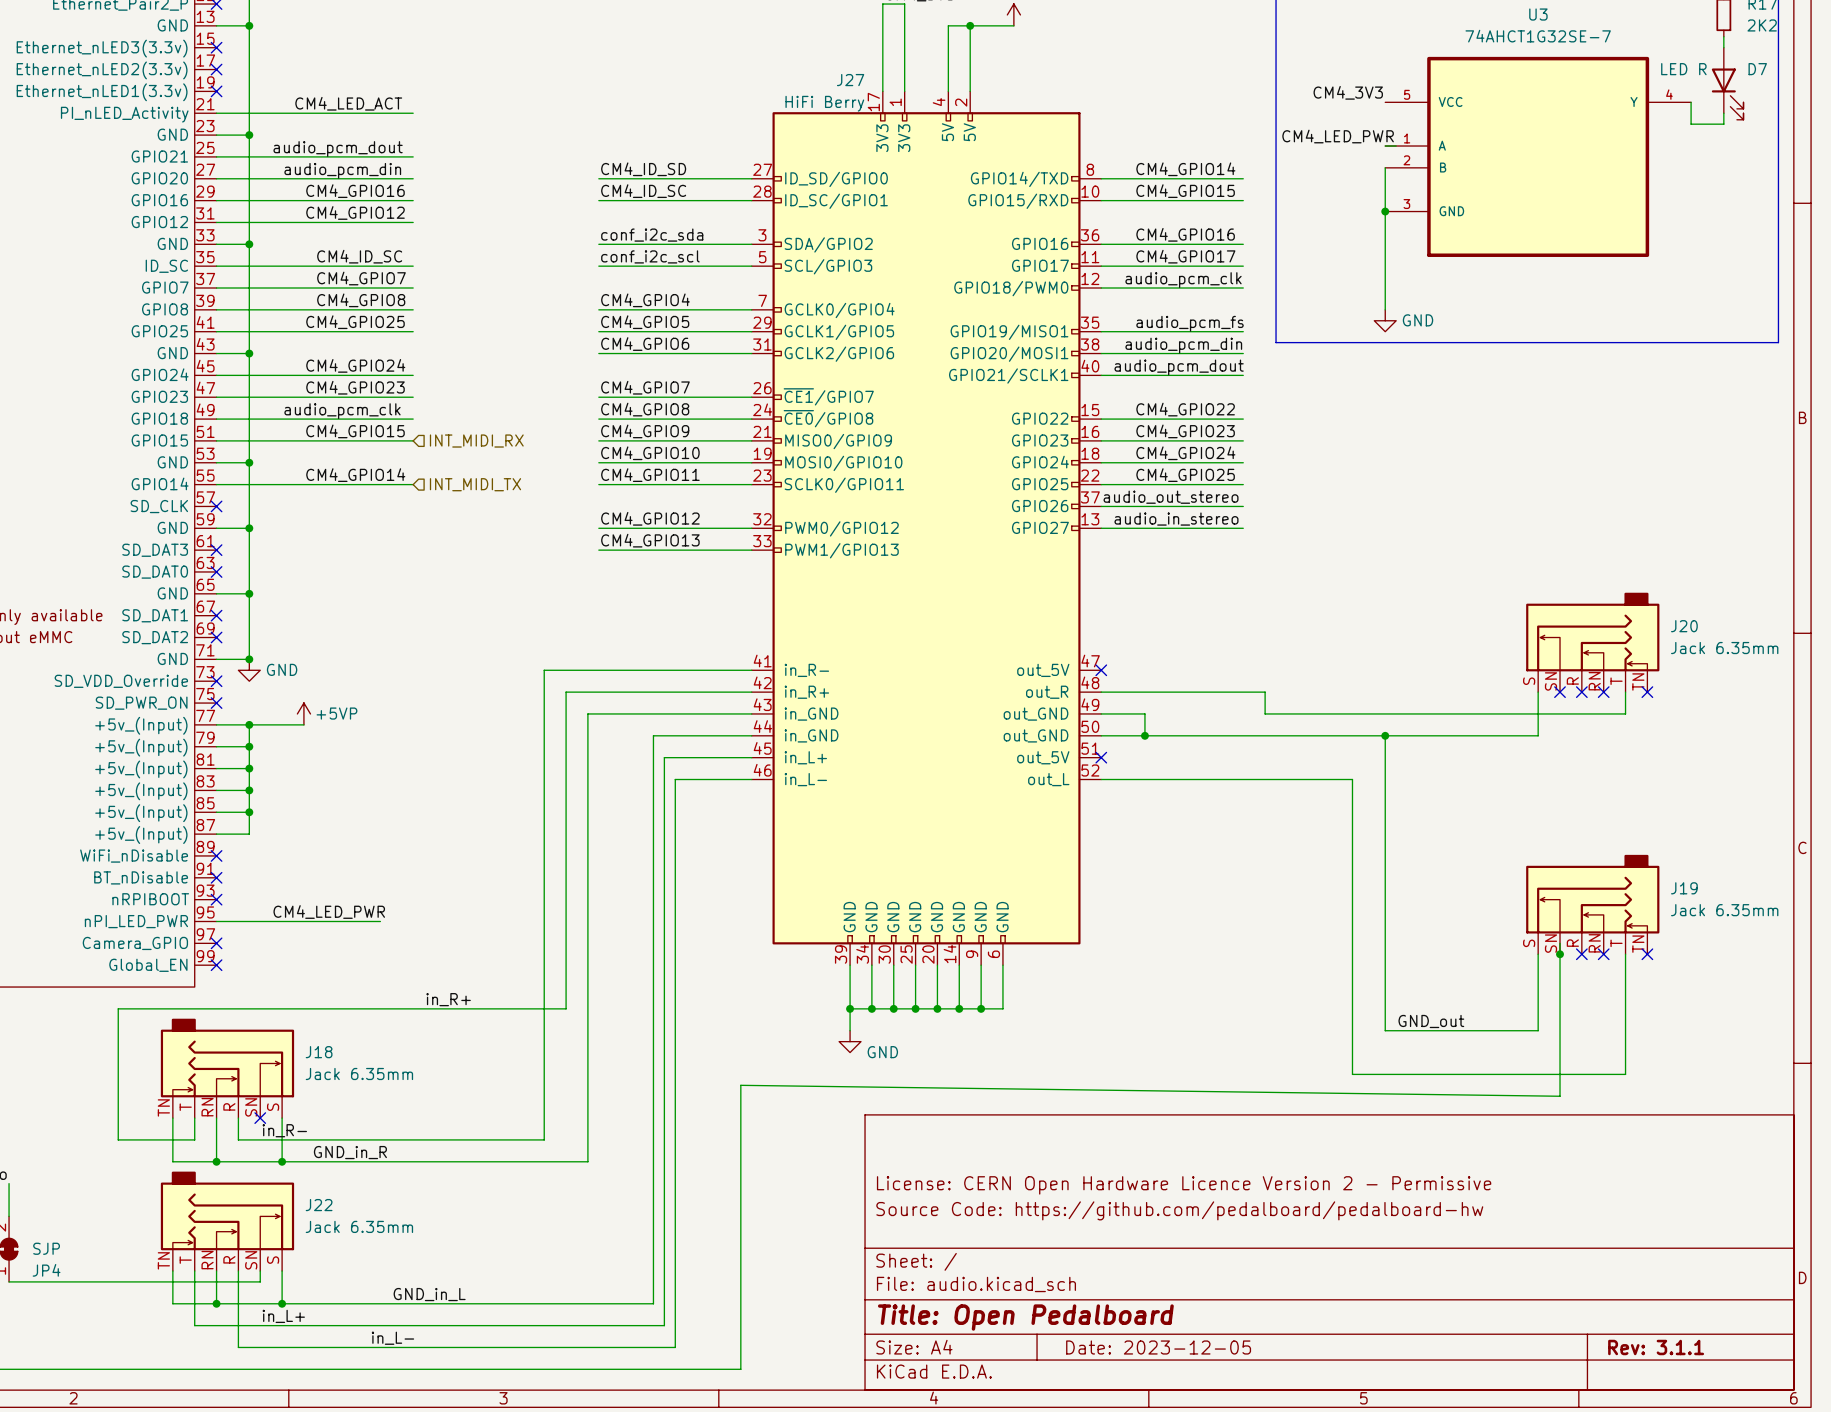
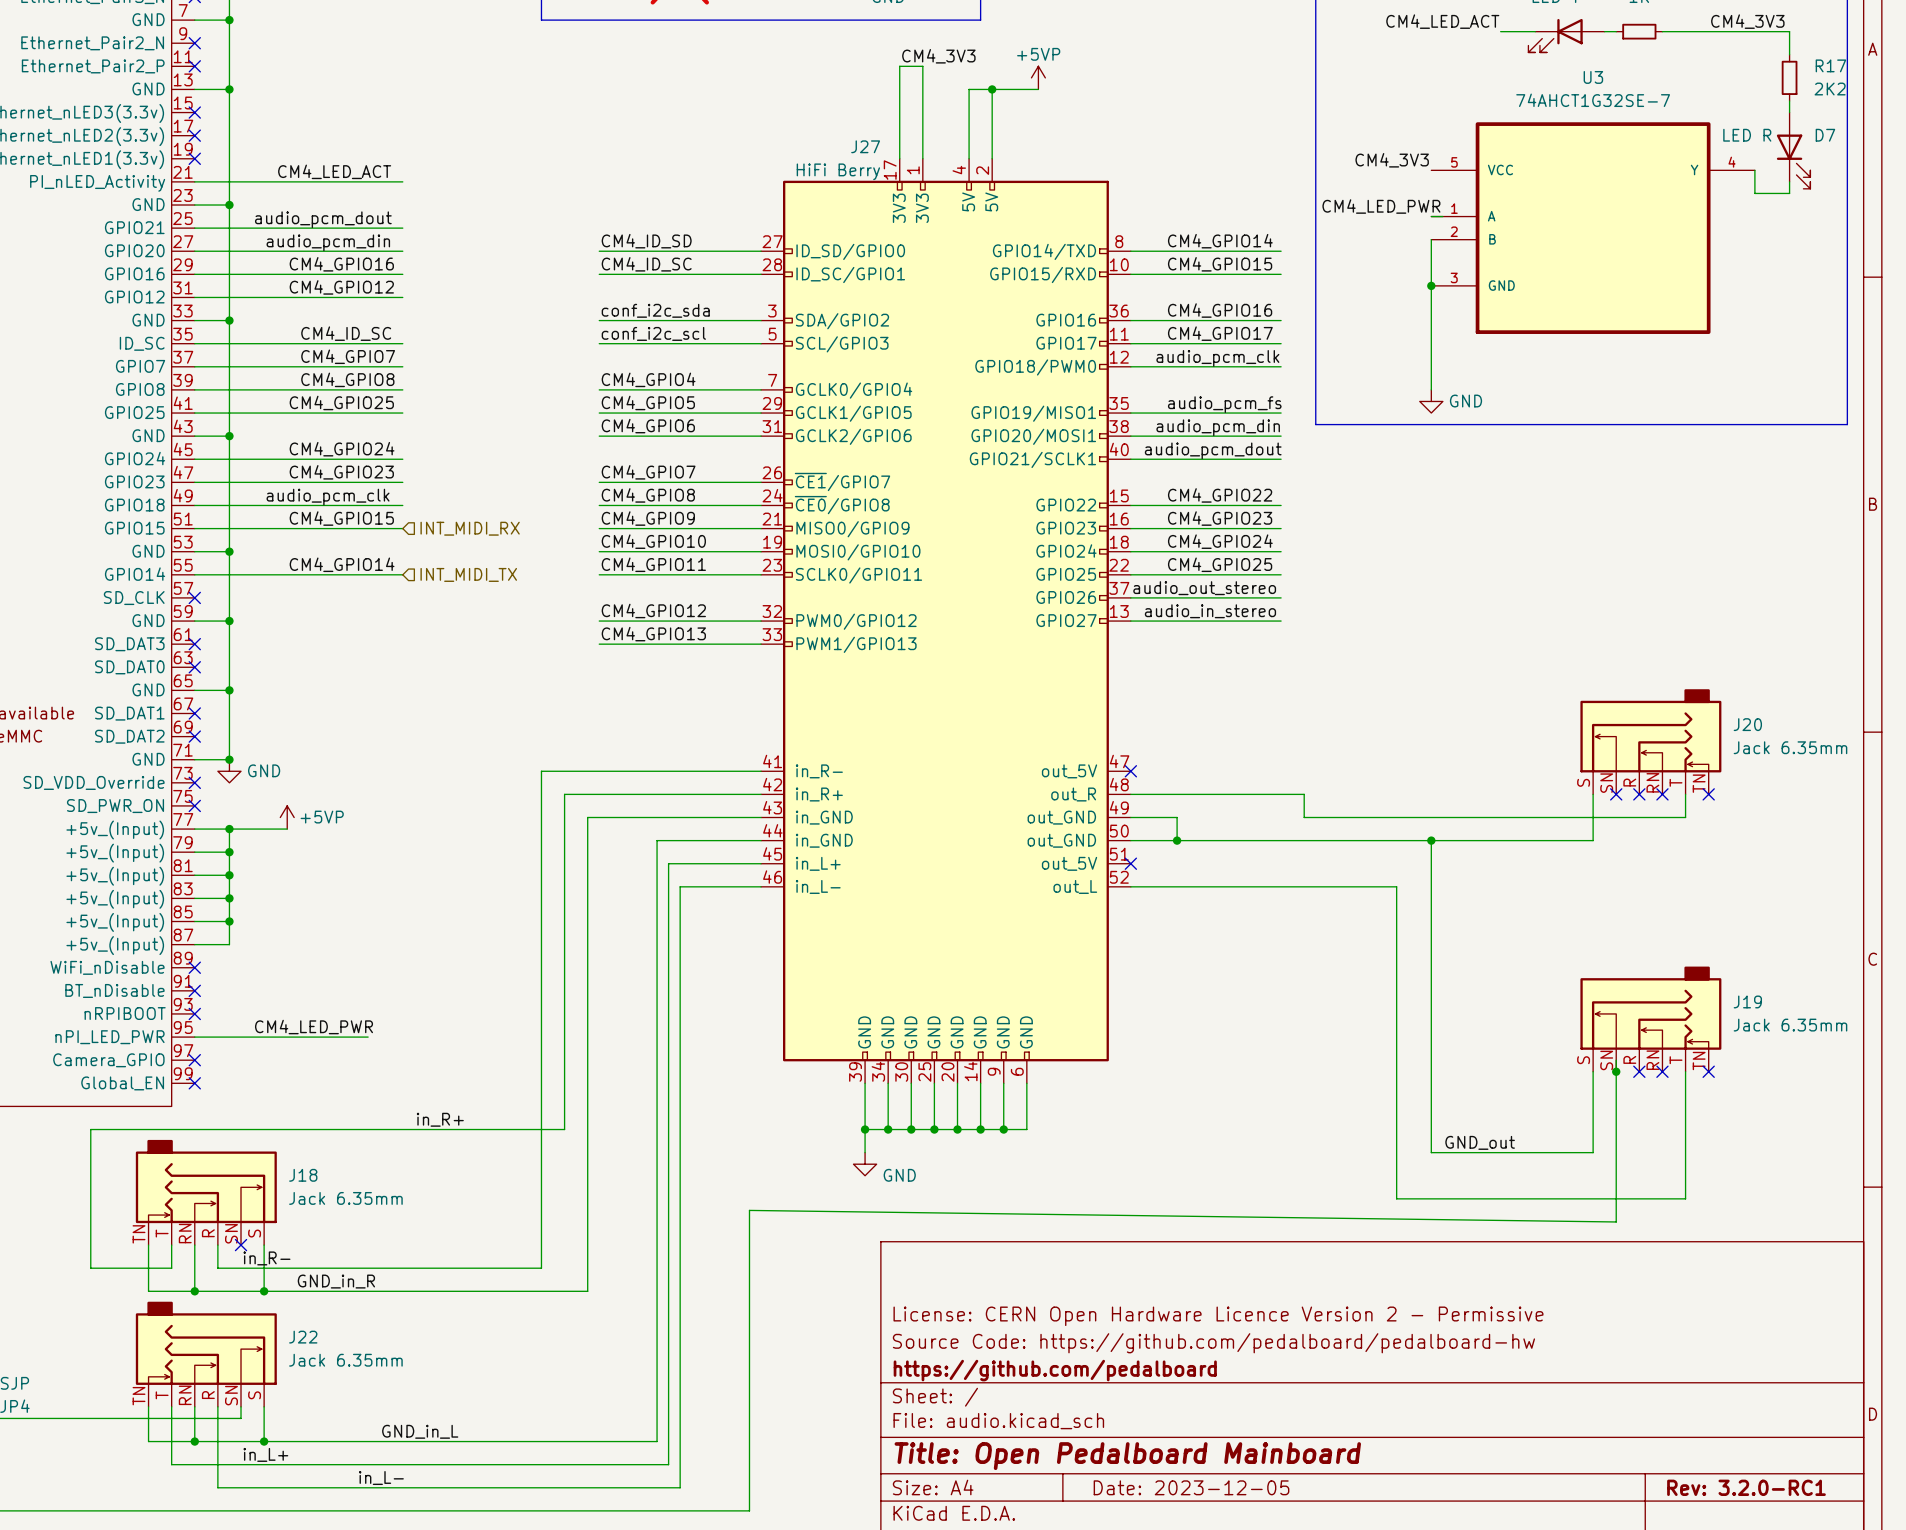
title block: none -> https://github.com/pedalboard (1055, 1370)
title block: Title: Open Pedalboard (1025, 1317) -> Title: Open Pedalboard Mainboard (1127, 1456)
title block: Rev: 3.1.1 (1656, 1347) -> Rev: 3.2.0-RC1 (1746, 1487)

